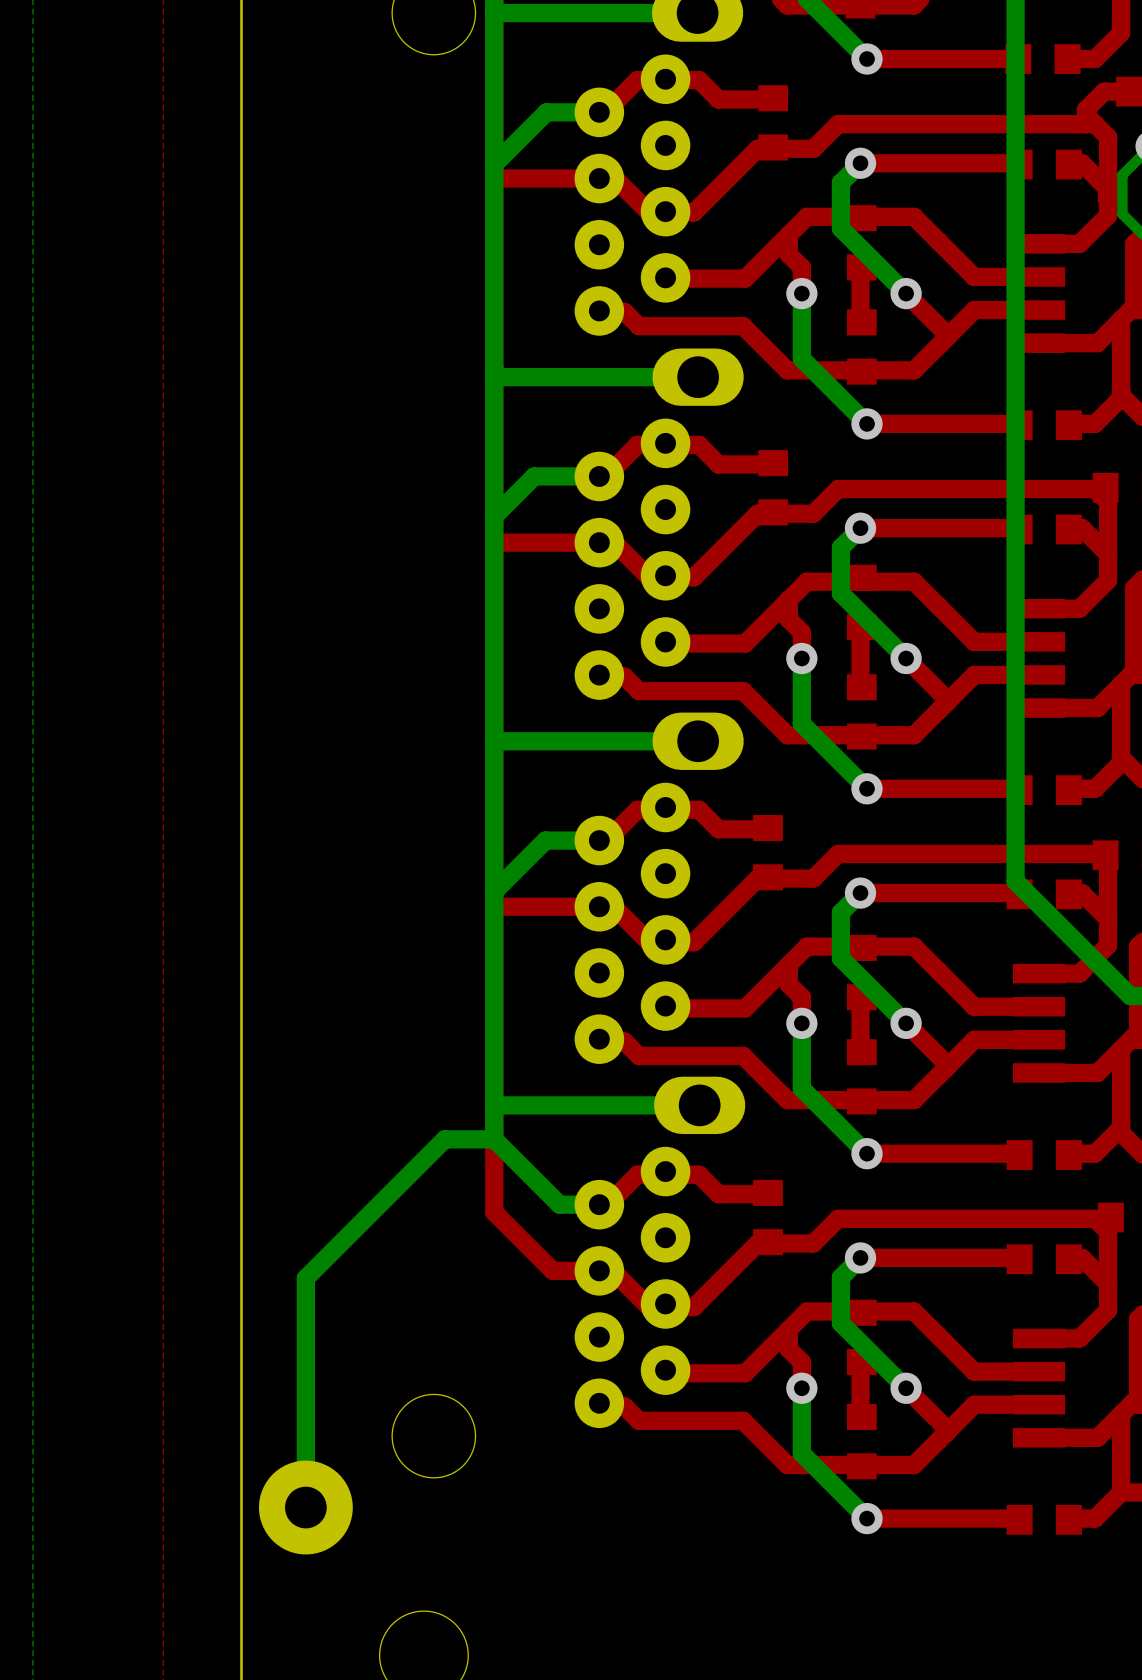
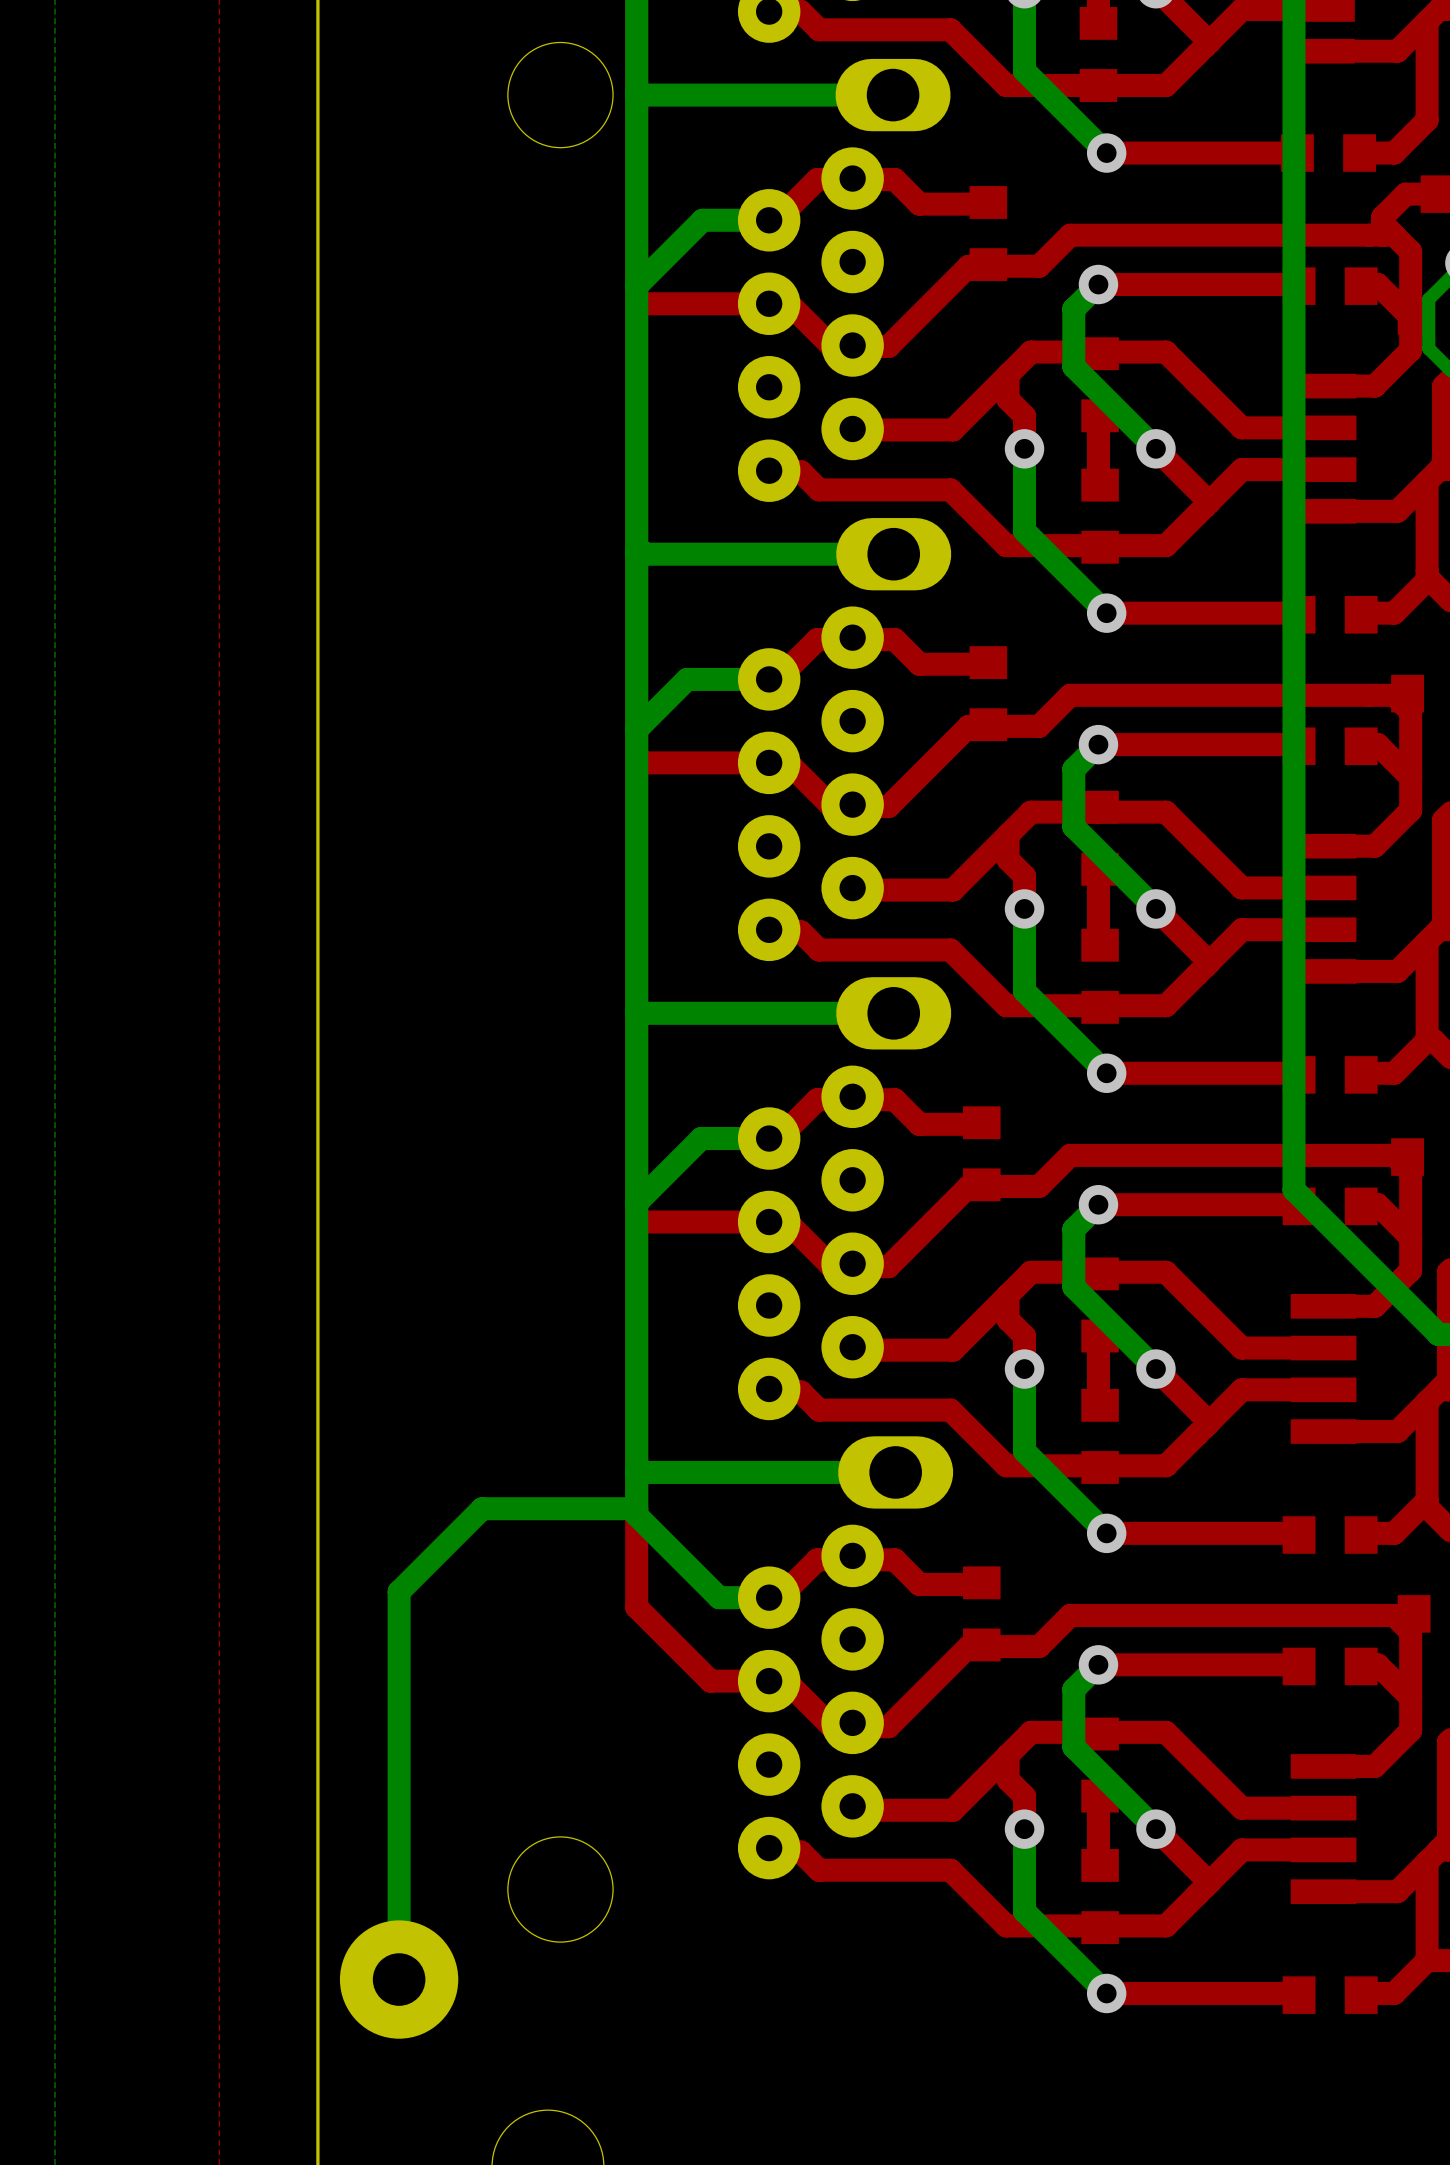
bottom track: (494, 1139) (444, 1139) (305, 1278) -> (636, 1508) (482, 1508) (399, 1591) (399, 1690)

